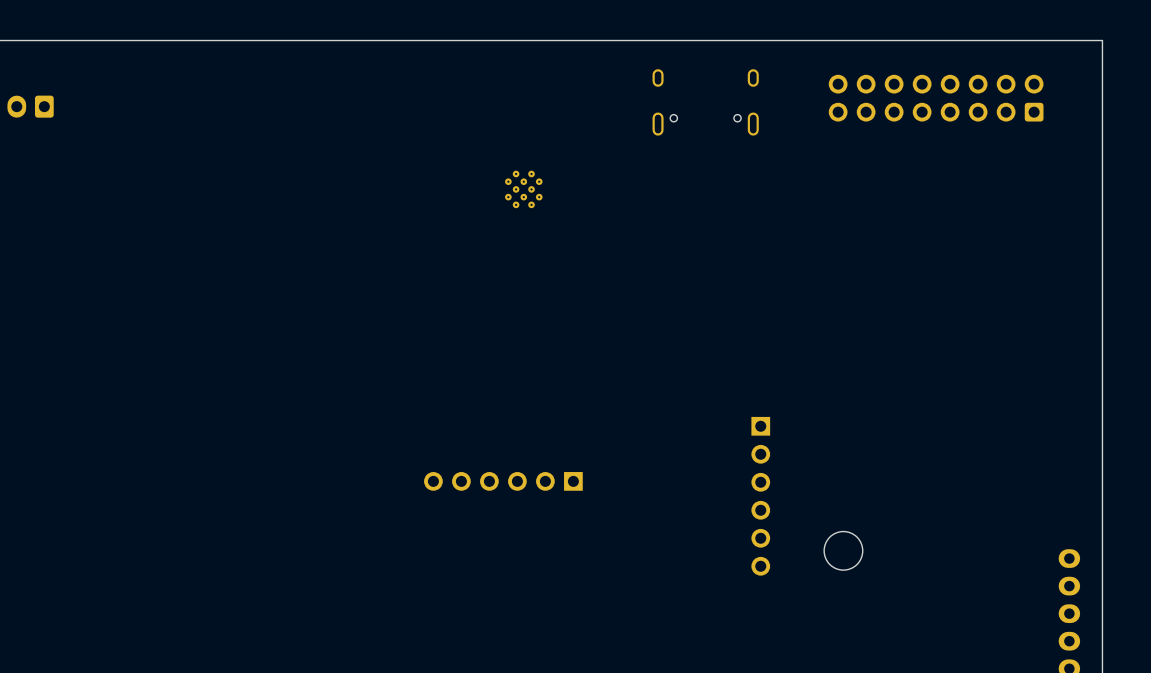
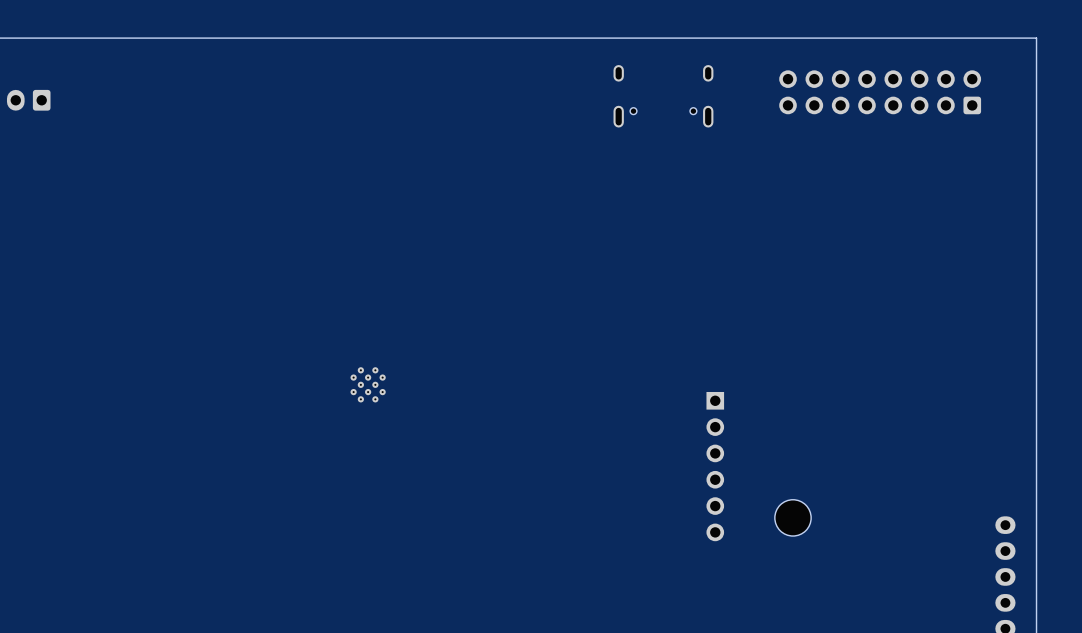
part position: (523, 189) -> (368, 384)
part: (503, 481) -> none

